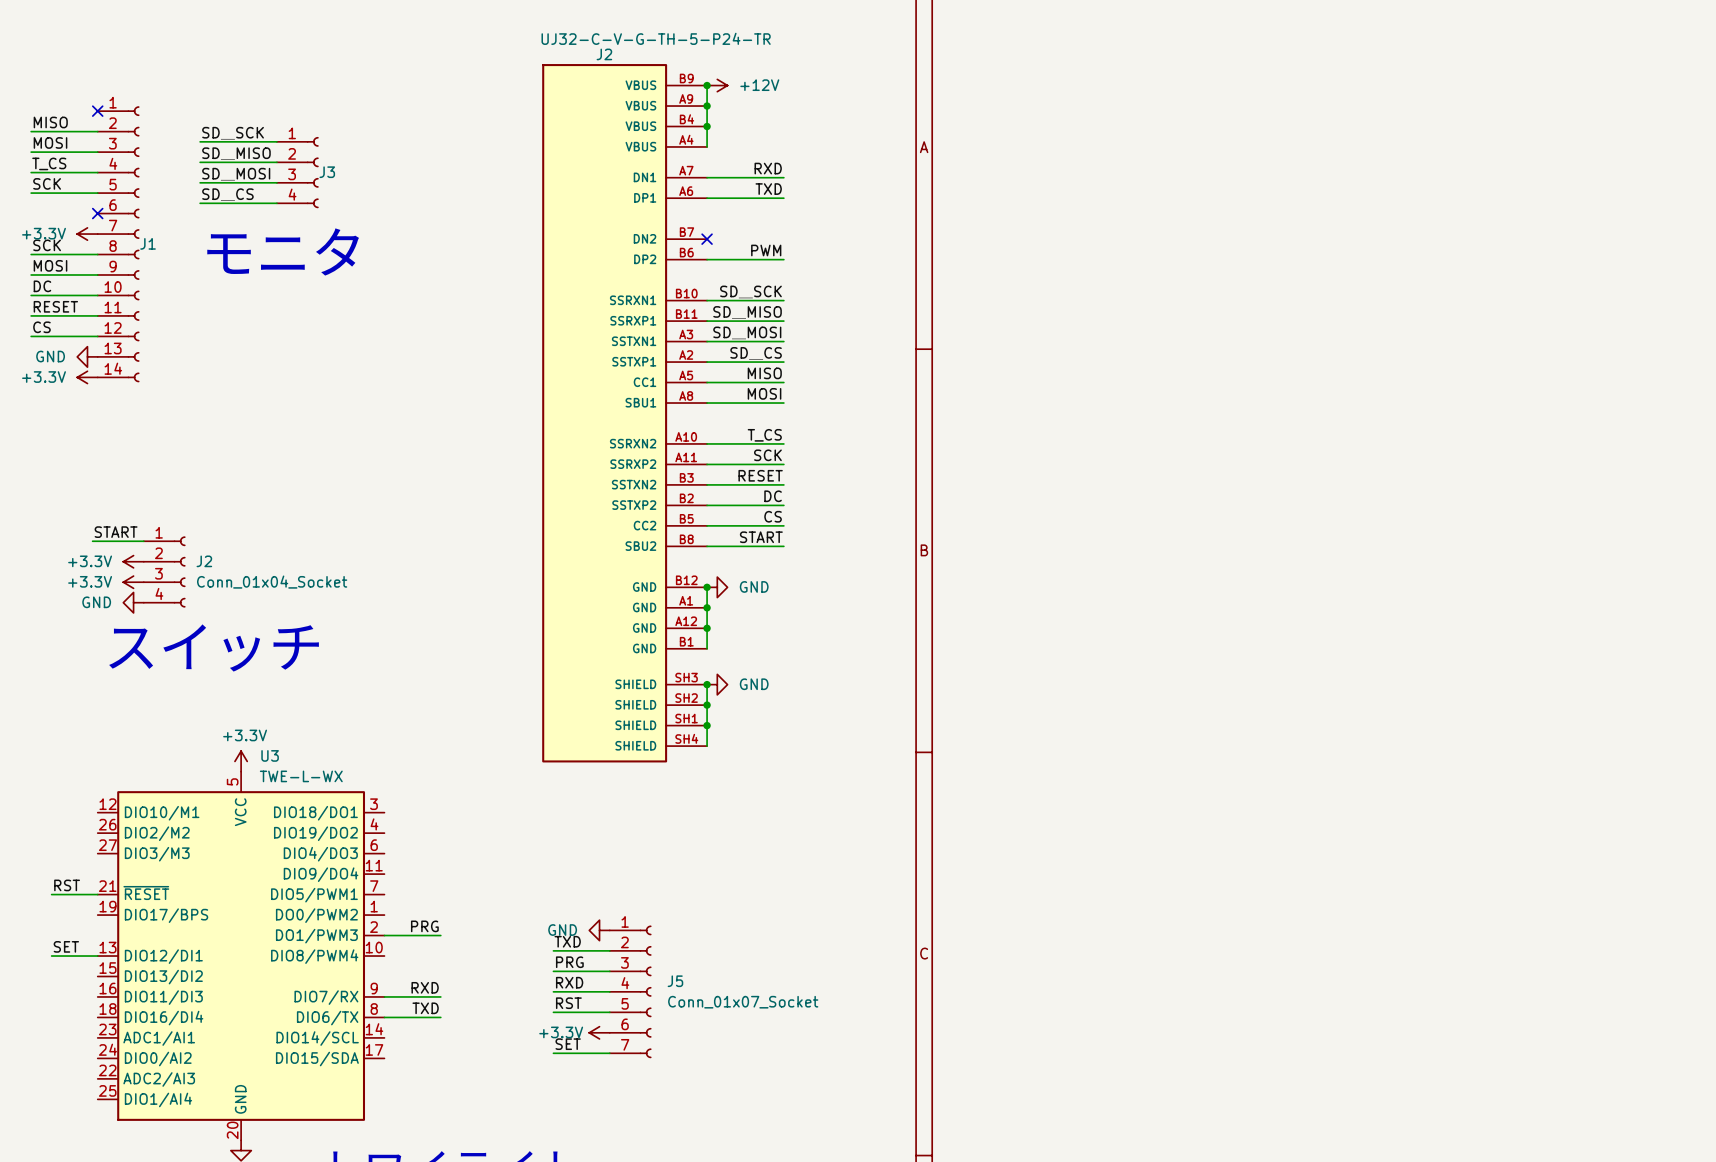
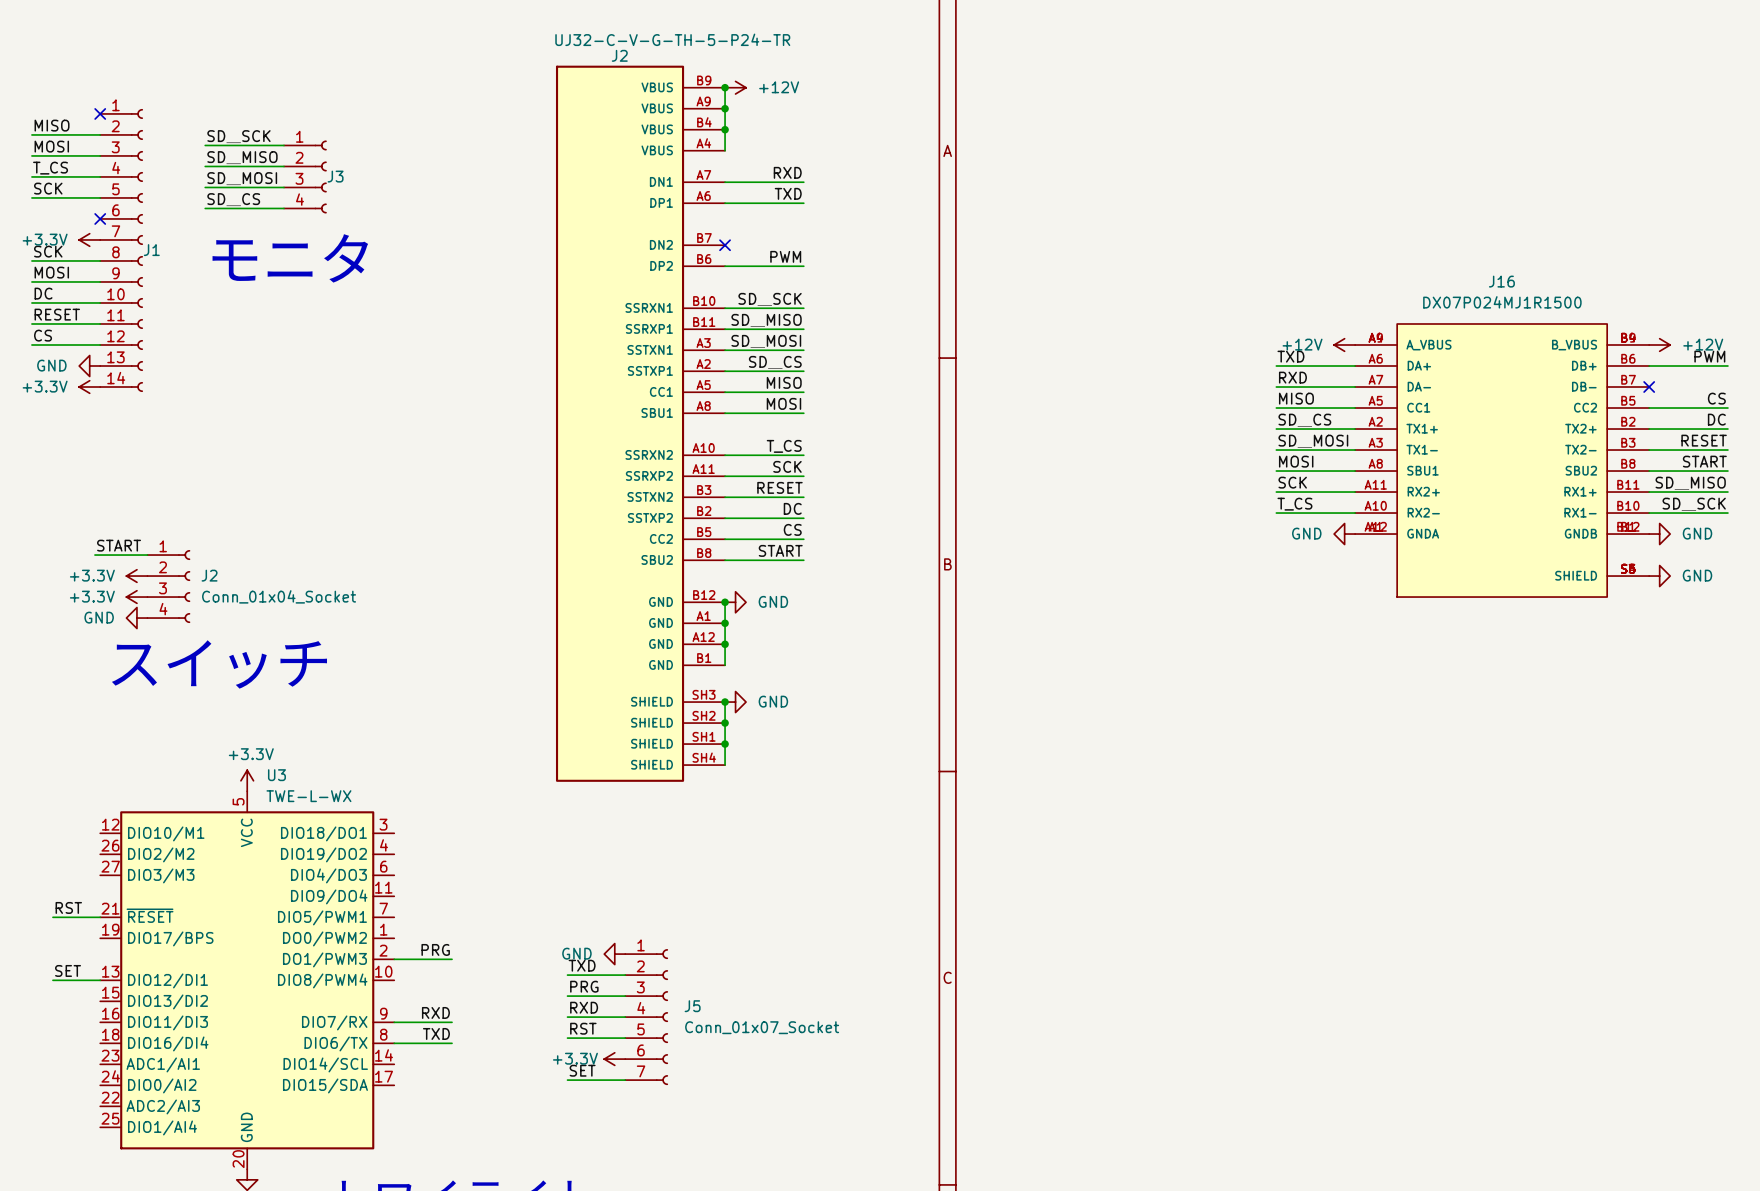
power symbol: none -> +12V (1344, 344)
power symbol: none -> +12V (1659, 344)
label: none -> TXD (1290, 356)
label: none -> PWM (1709, 356)
wire: none -> (1276, 366) (1355, 366)
wire: none -> (1649, 366) (1727, 366)
label: none -> RXD (1292, 377)
wire: none -> (1276, 387) (1355, 387)
no-connect mark: none -> (1649, 387)
label: none -> MISO (1296, 398)
label: none -> CS (1716, 398)
wire: none -> (1276, 408) (1355, 408)
wire: none -> (1649, 408) (1727, 408)
label: none -> DC (1716, 419)
label: none -> SD＿CS (1304, 420)
wire: none -> (1276, 429) (1355, 429)
wire: none -> (1649, 429) (1727, 429)
label: none -> RESET (1704, 440)
label: none -> SD＿MOSI (1313, 441)
wire: none -> (1276, 450) (1355, 450)
wire: none -> (1649, 450) (1727, 450)
J16: none -> DX07P024MJ1R1500 (1502, 460)
label: none -> MOSI (1296, 461)
label: none -> START (1704, 461)
wire: none -> (1276, 471) (1355, 471)
wire: none -> (1649, 471) (1727, 471)
label: none -> SCK (1292, 482)
label: none -> SD＿MISO (1690, 483)
wire: none -> (1276, 492) (1355, 492)
wire: none -> (1649, 492) (1727, 492)
label: none -> T_CS (1294, 504)
label: none -> SD＿SCK (1694, 504)
wire: none -> (1276, 513) (1355, 513)
wire: none -> (1649, 513) (1727, 513)
power symbol: none -> GND (1344, 534)
power symbol: none -> GND (1659, 534)
power symbol: none -> GND (1659, 576)

